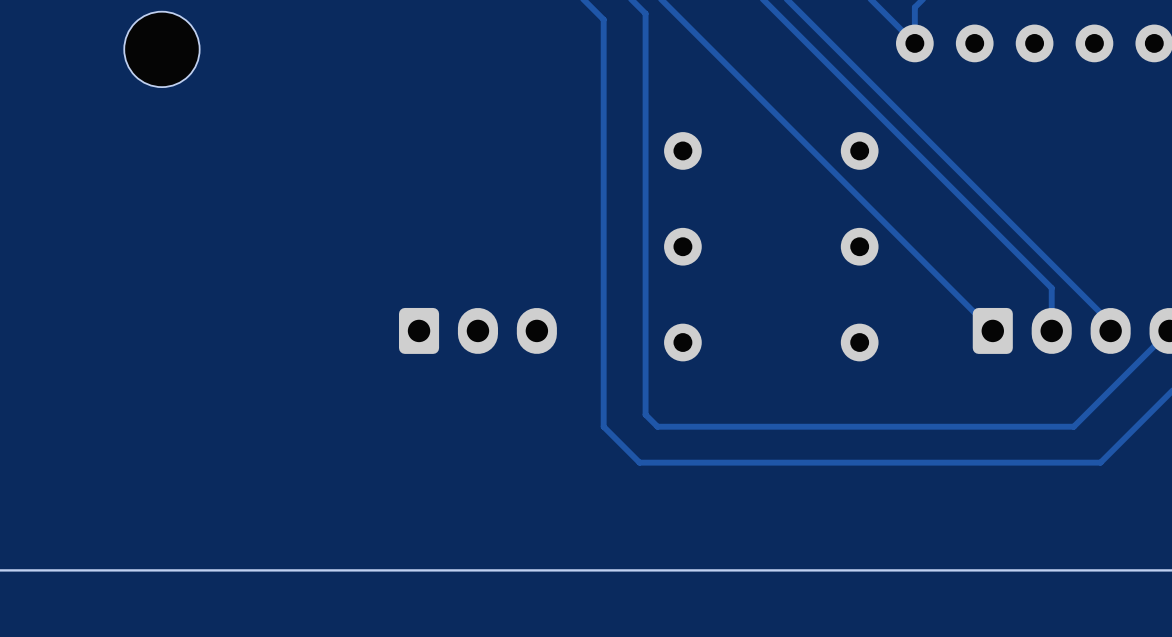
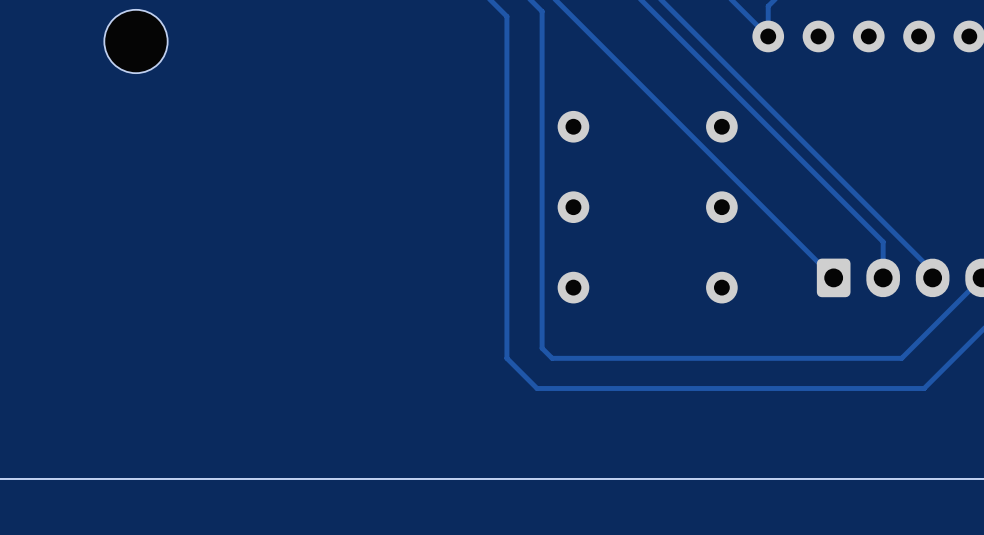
part: (477, 330) -> none

